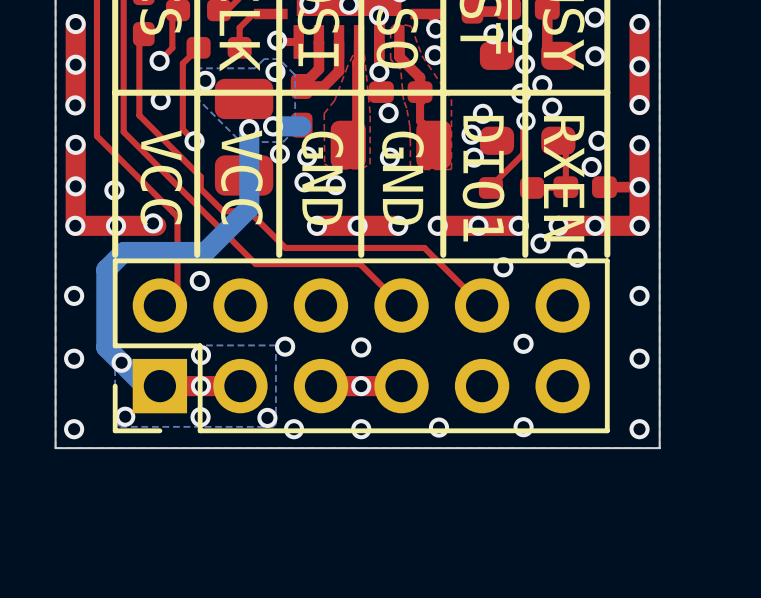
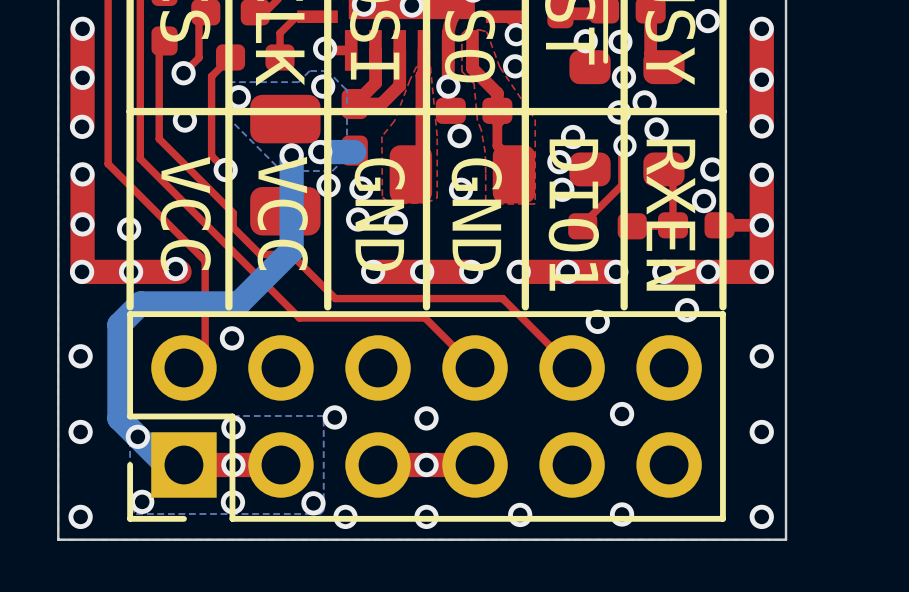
via: (378, 15) -> none
via: (595, 56) -> none
via: (540, 243) -> none

